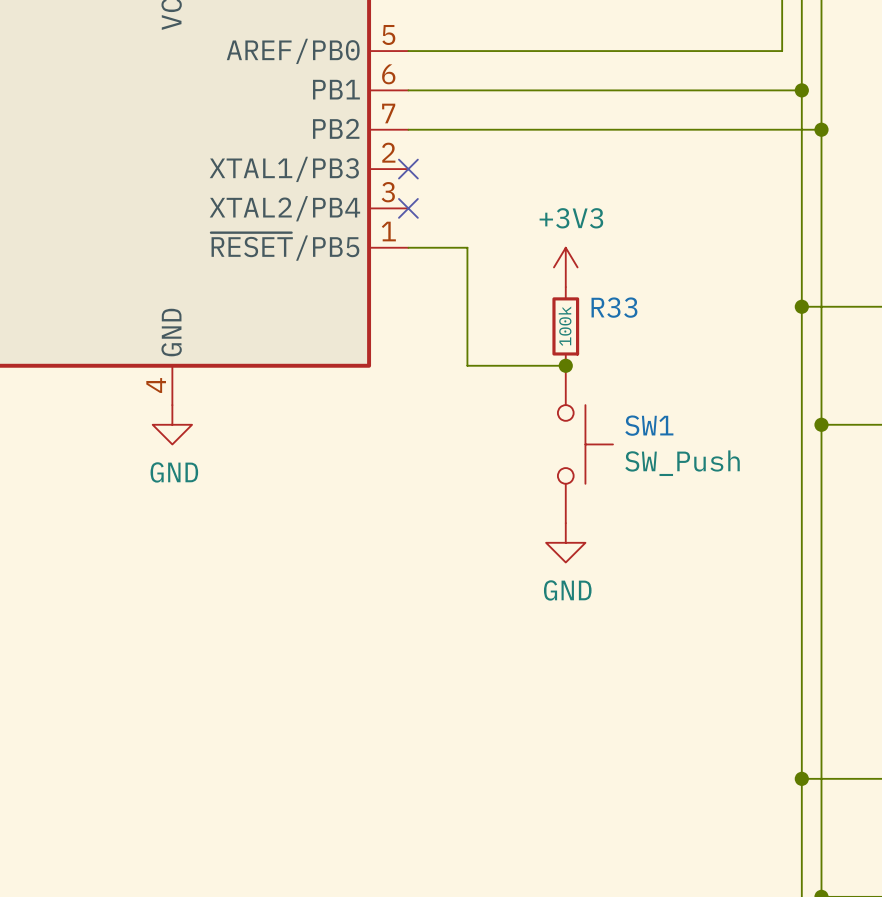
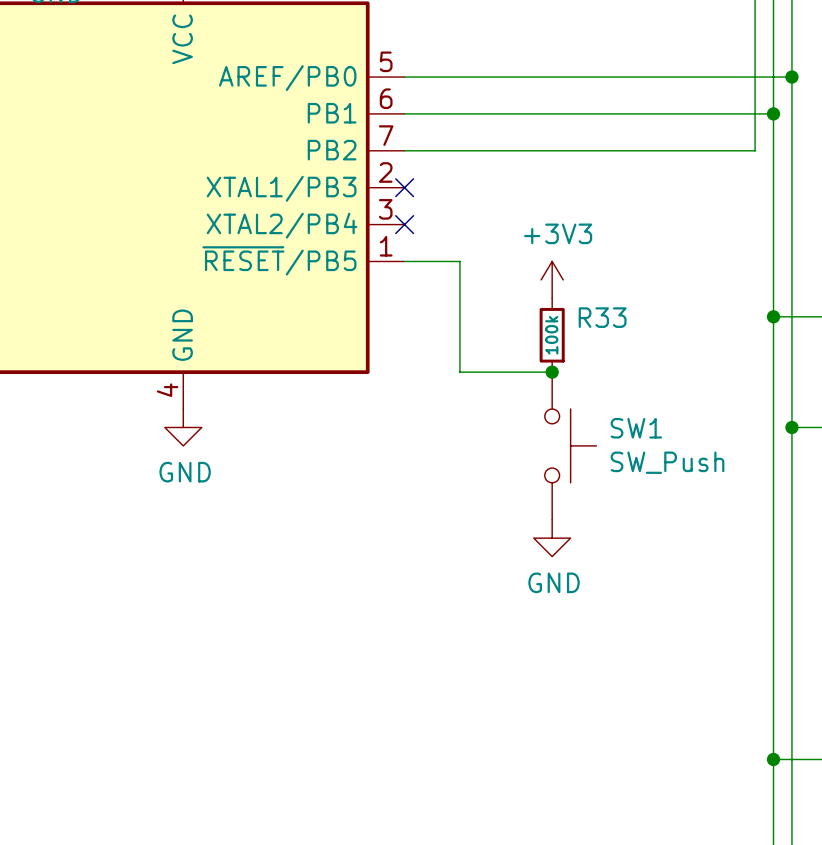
wire: (782, 129) (821, 129) -> (755, 150) (755, 77) (791, 77)
junction position: (821, 129) -> (791, 77)

